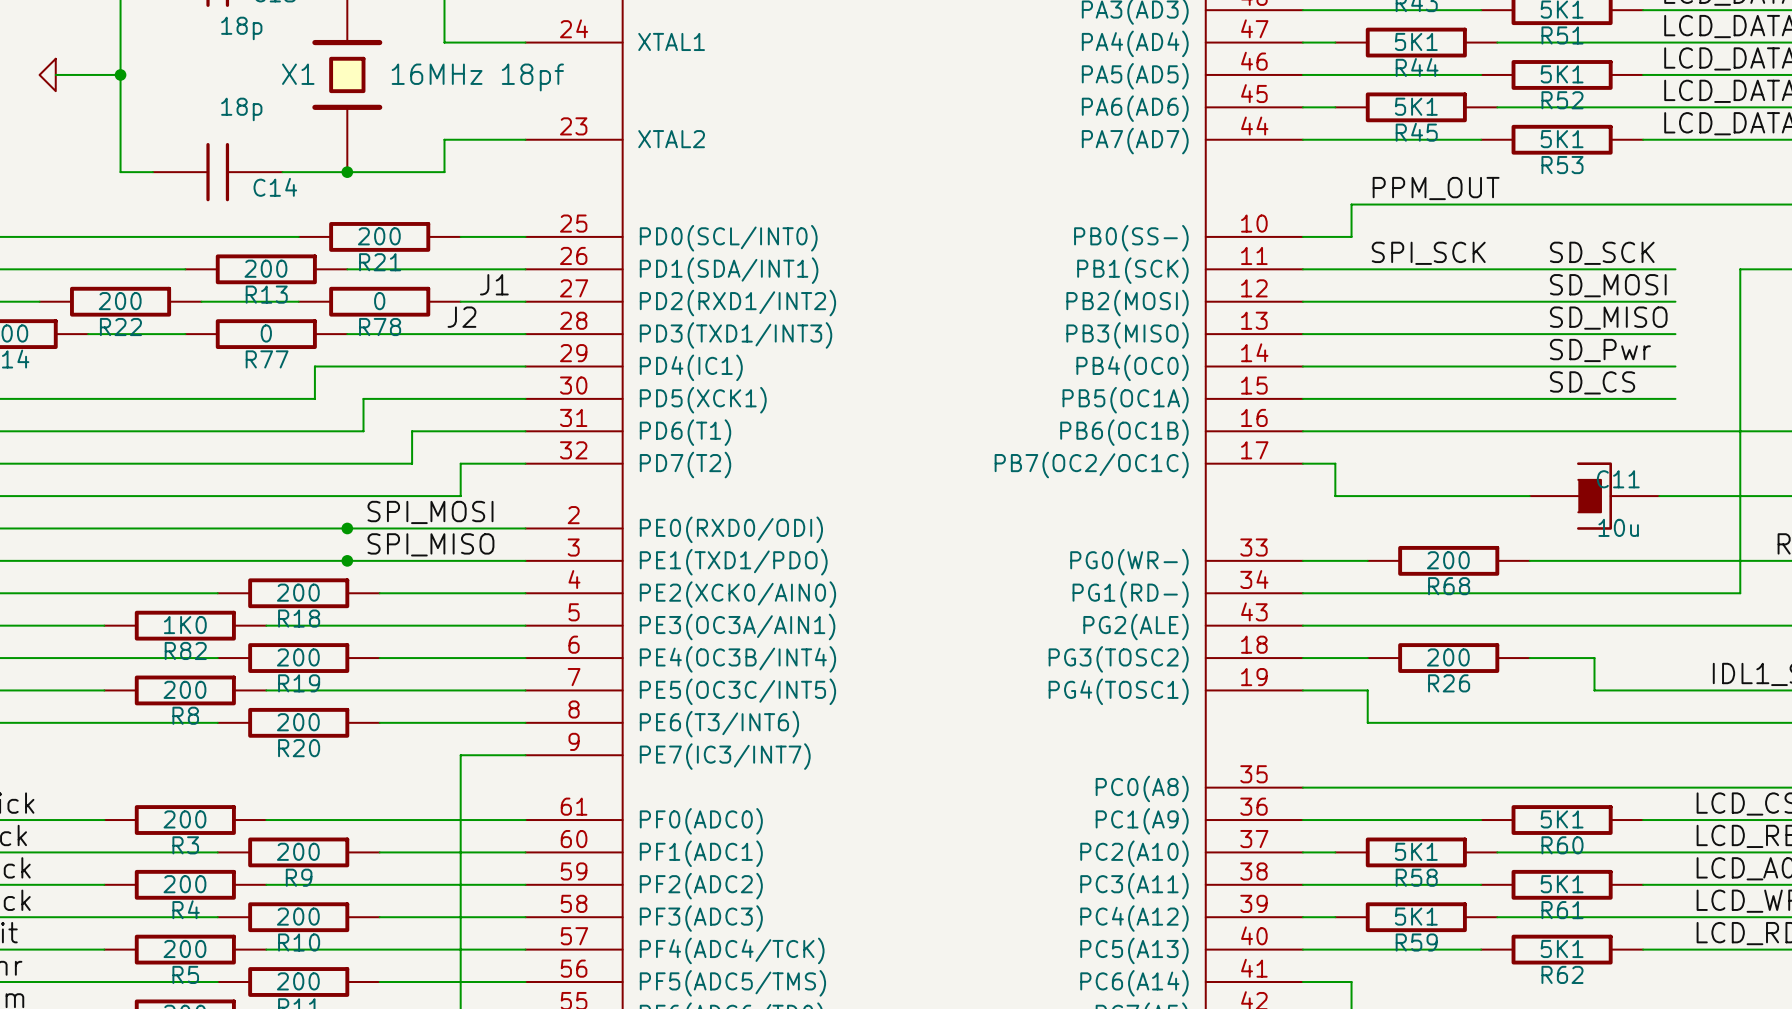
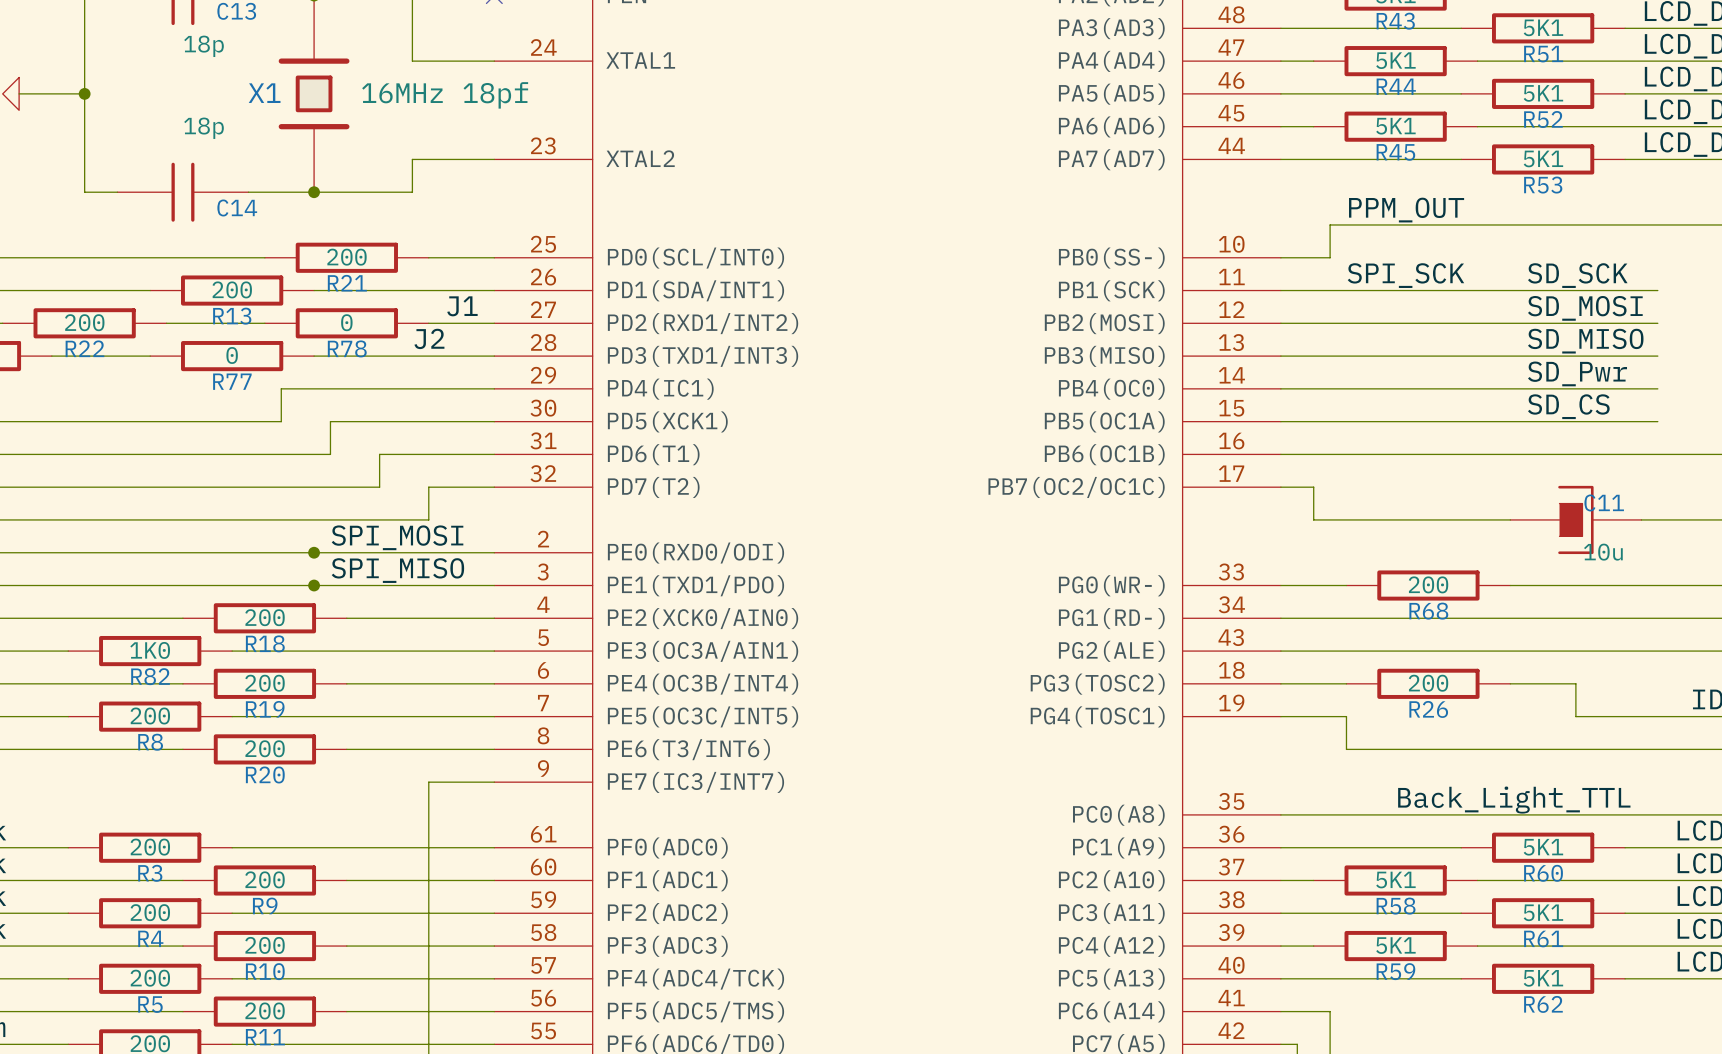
label: none -> Back_Light_TTL (1514, 800)

